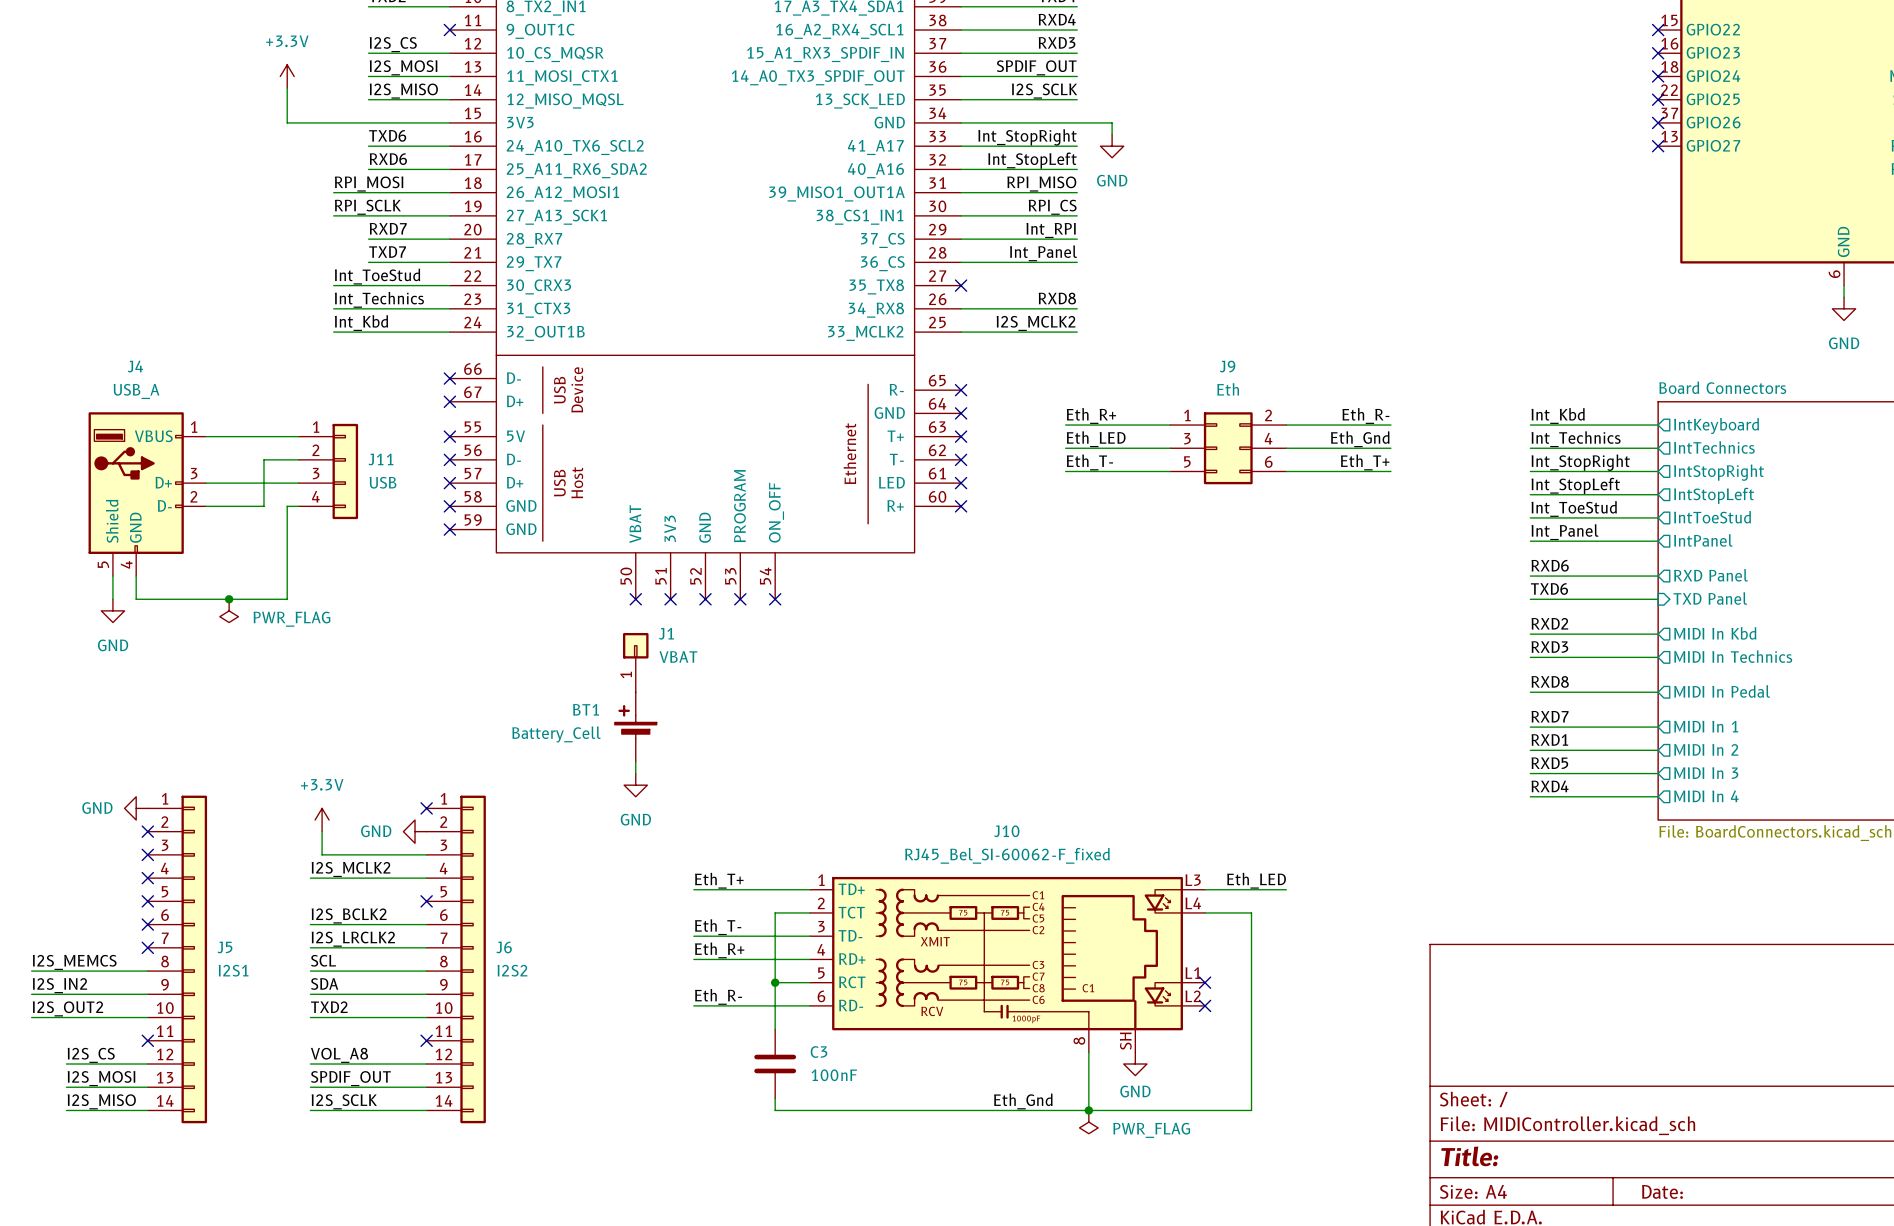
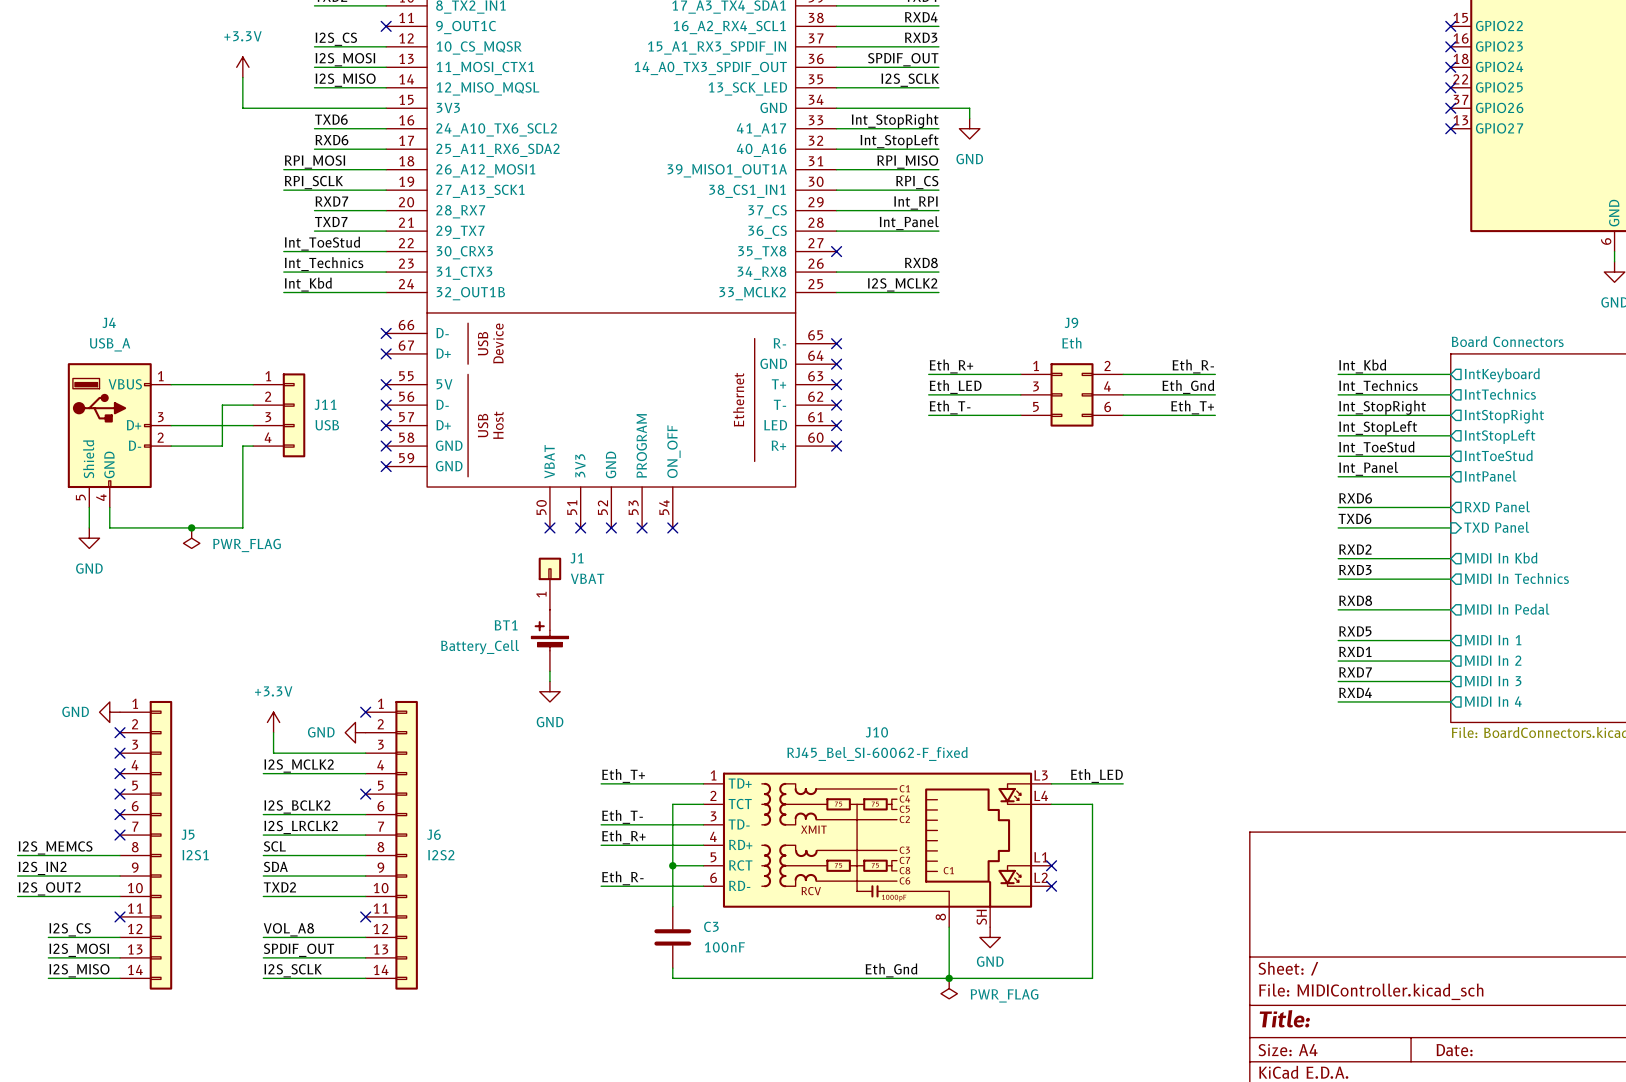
label: RXD7 (1550, 716) -> RXD5 (1355, 631)
label: RXD5 (1549, 763) -> RXD7 (1355, 672)

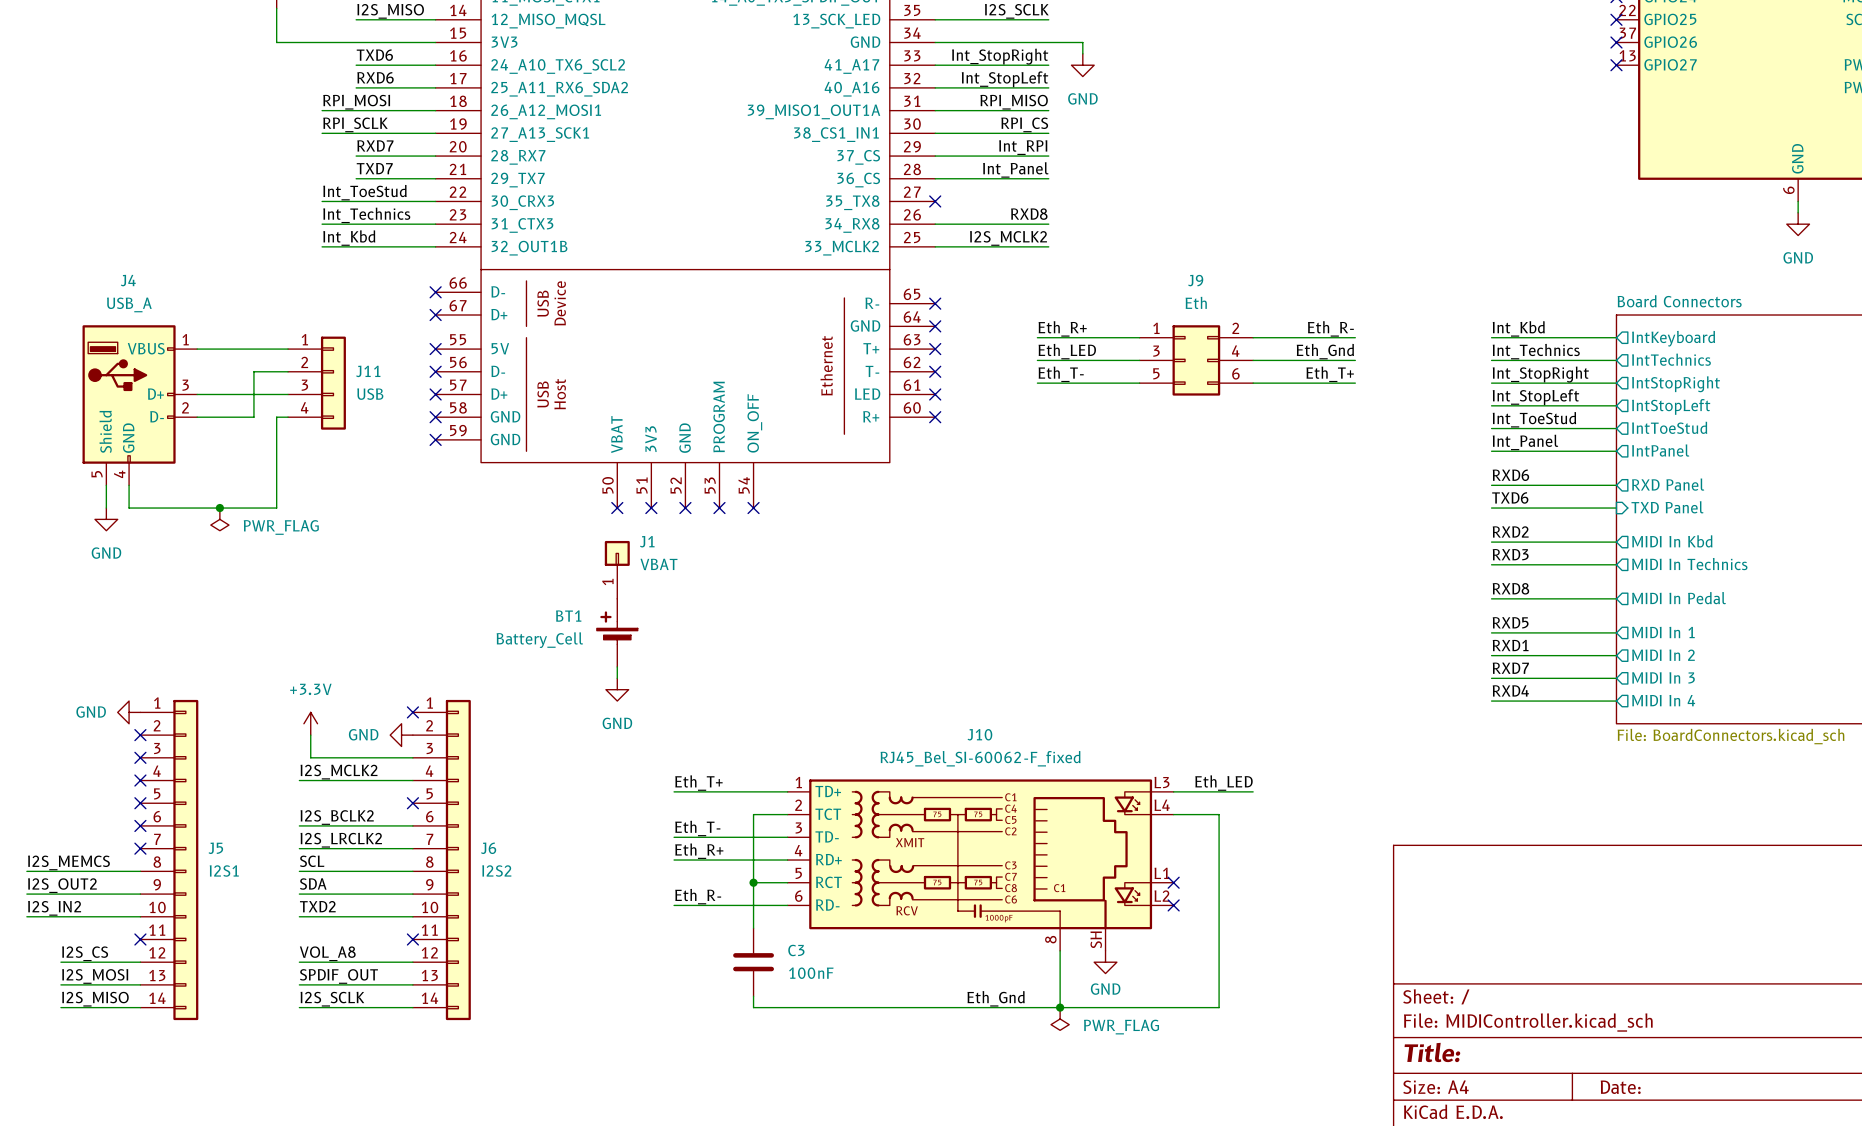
label: I2S_IN2 (42, 868) -> I2S_OUT2 (62, 885)
label: I2S_OUT2 (49, 888) -> I2S_IN2 (54, 908)

